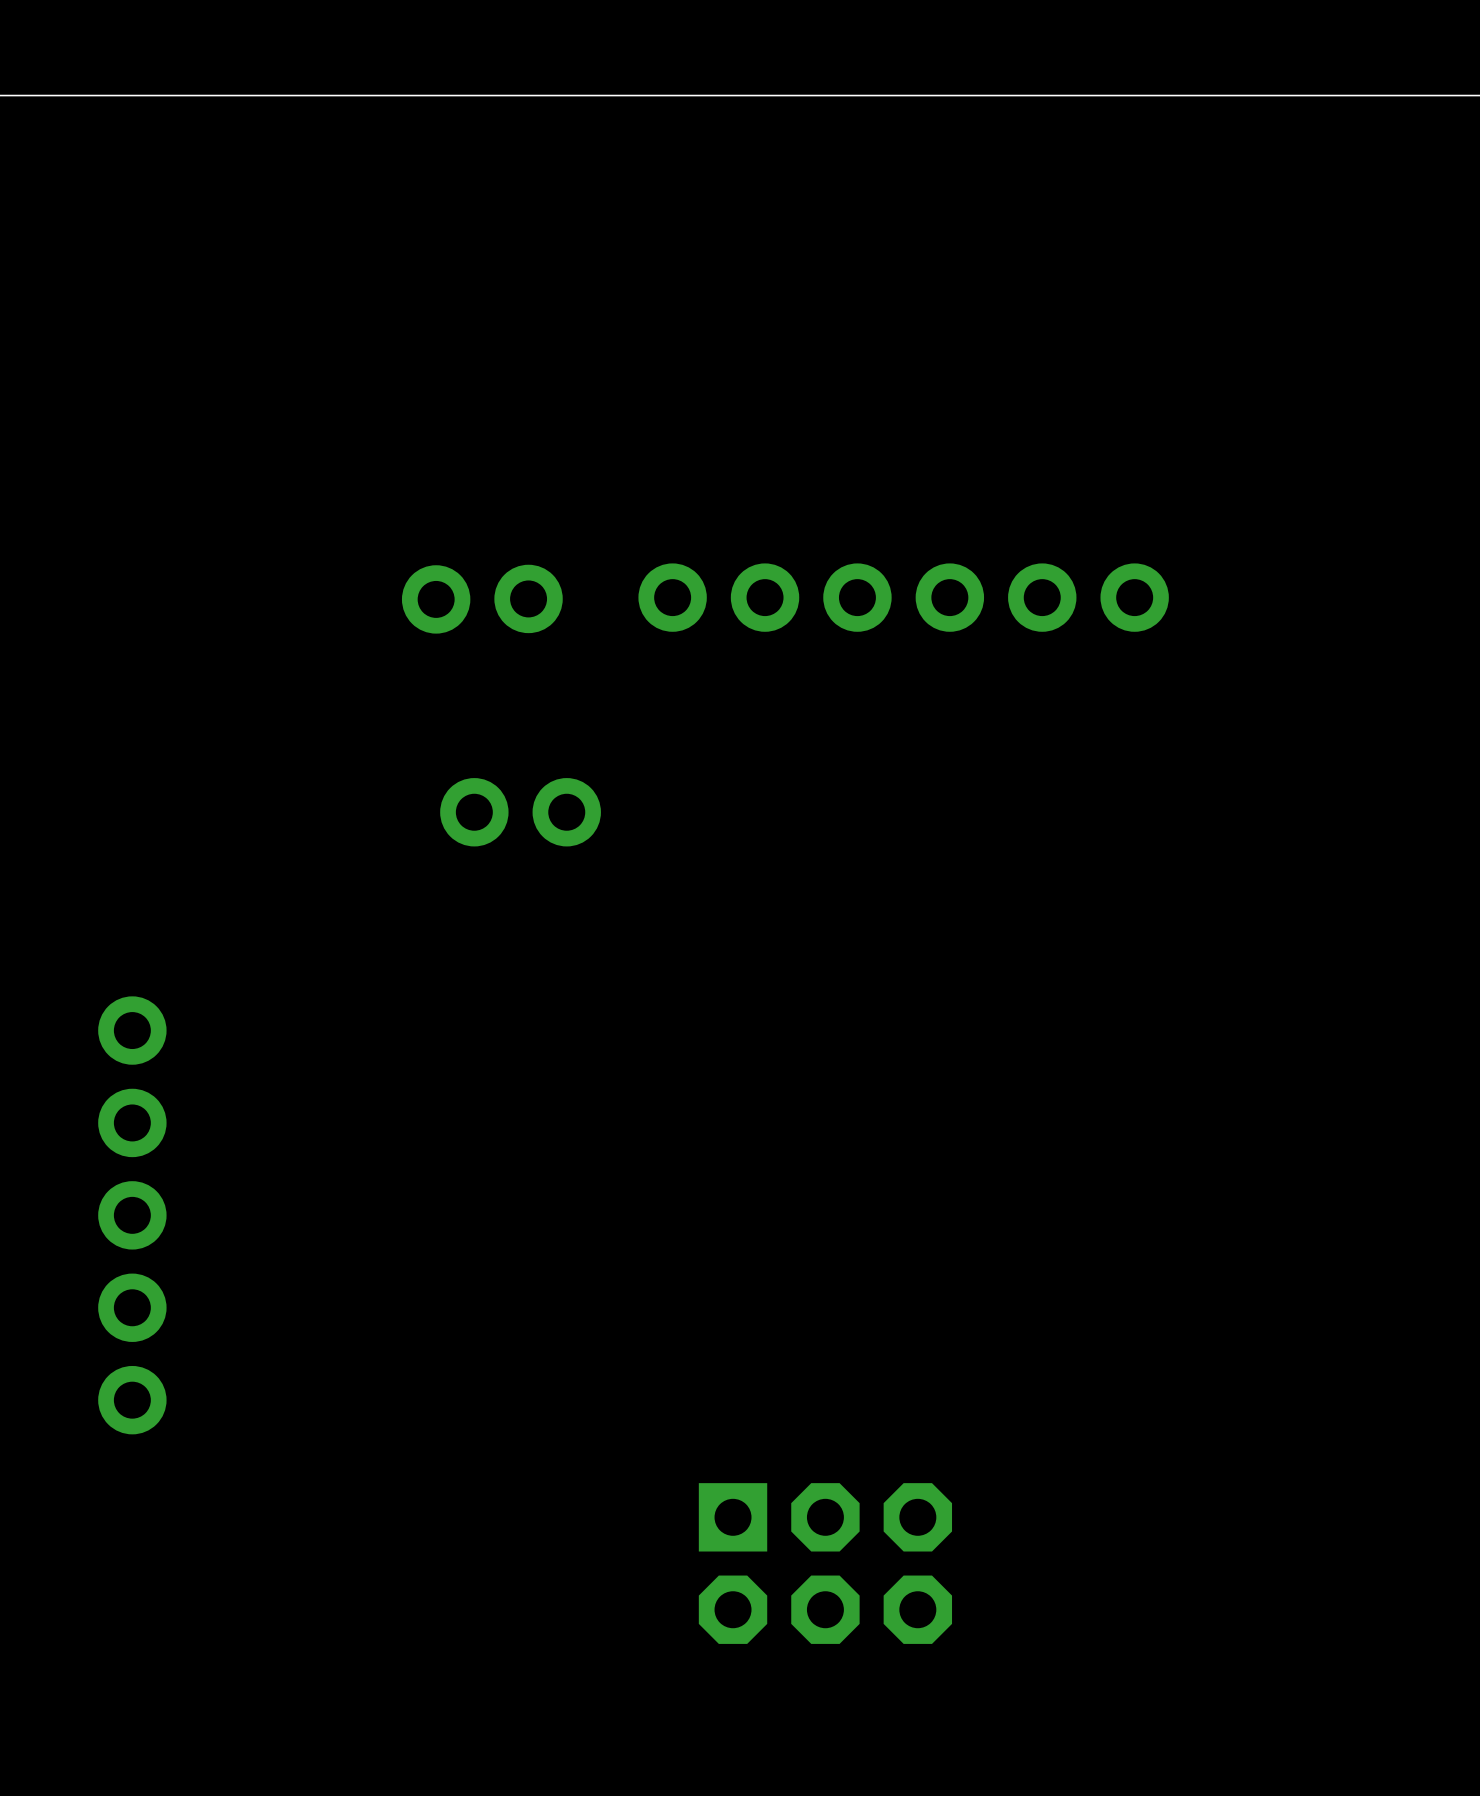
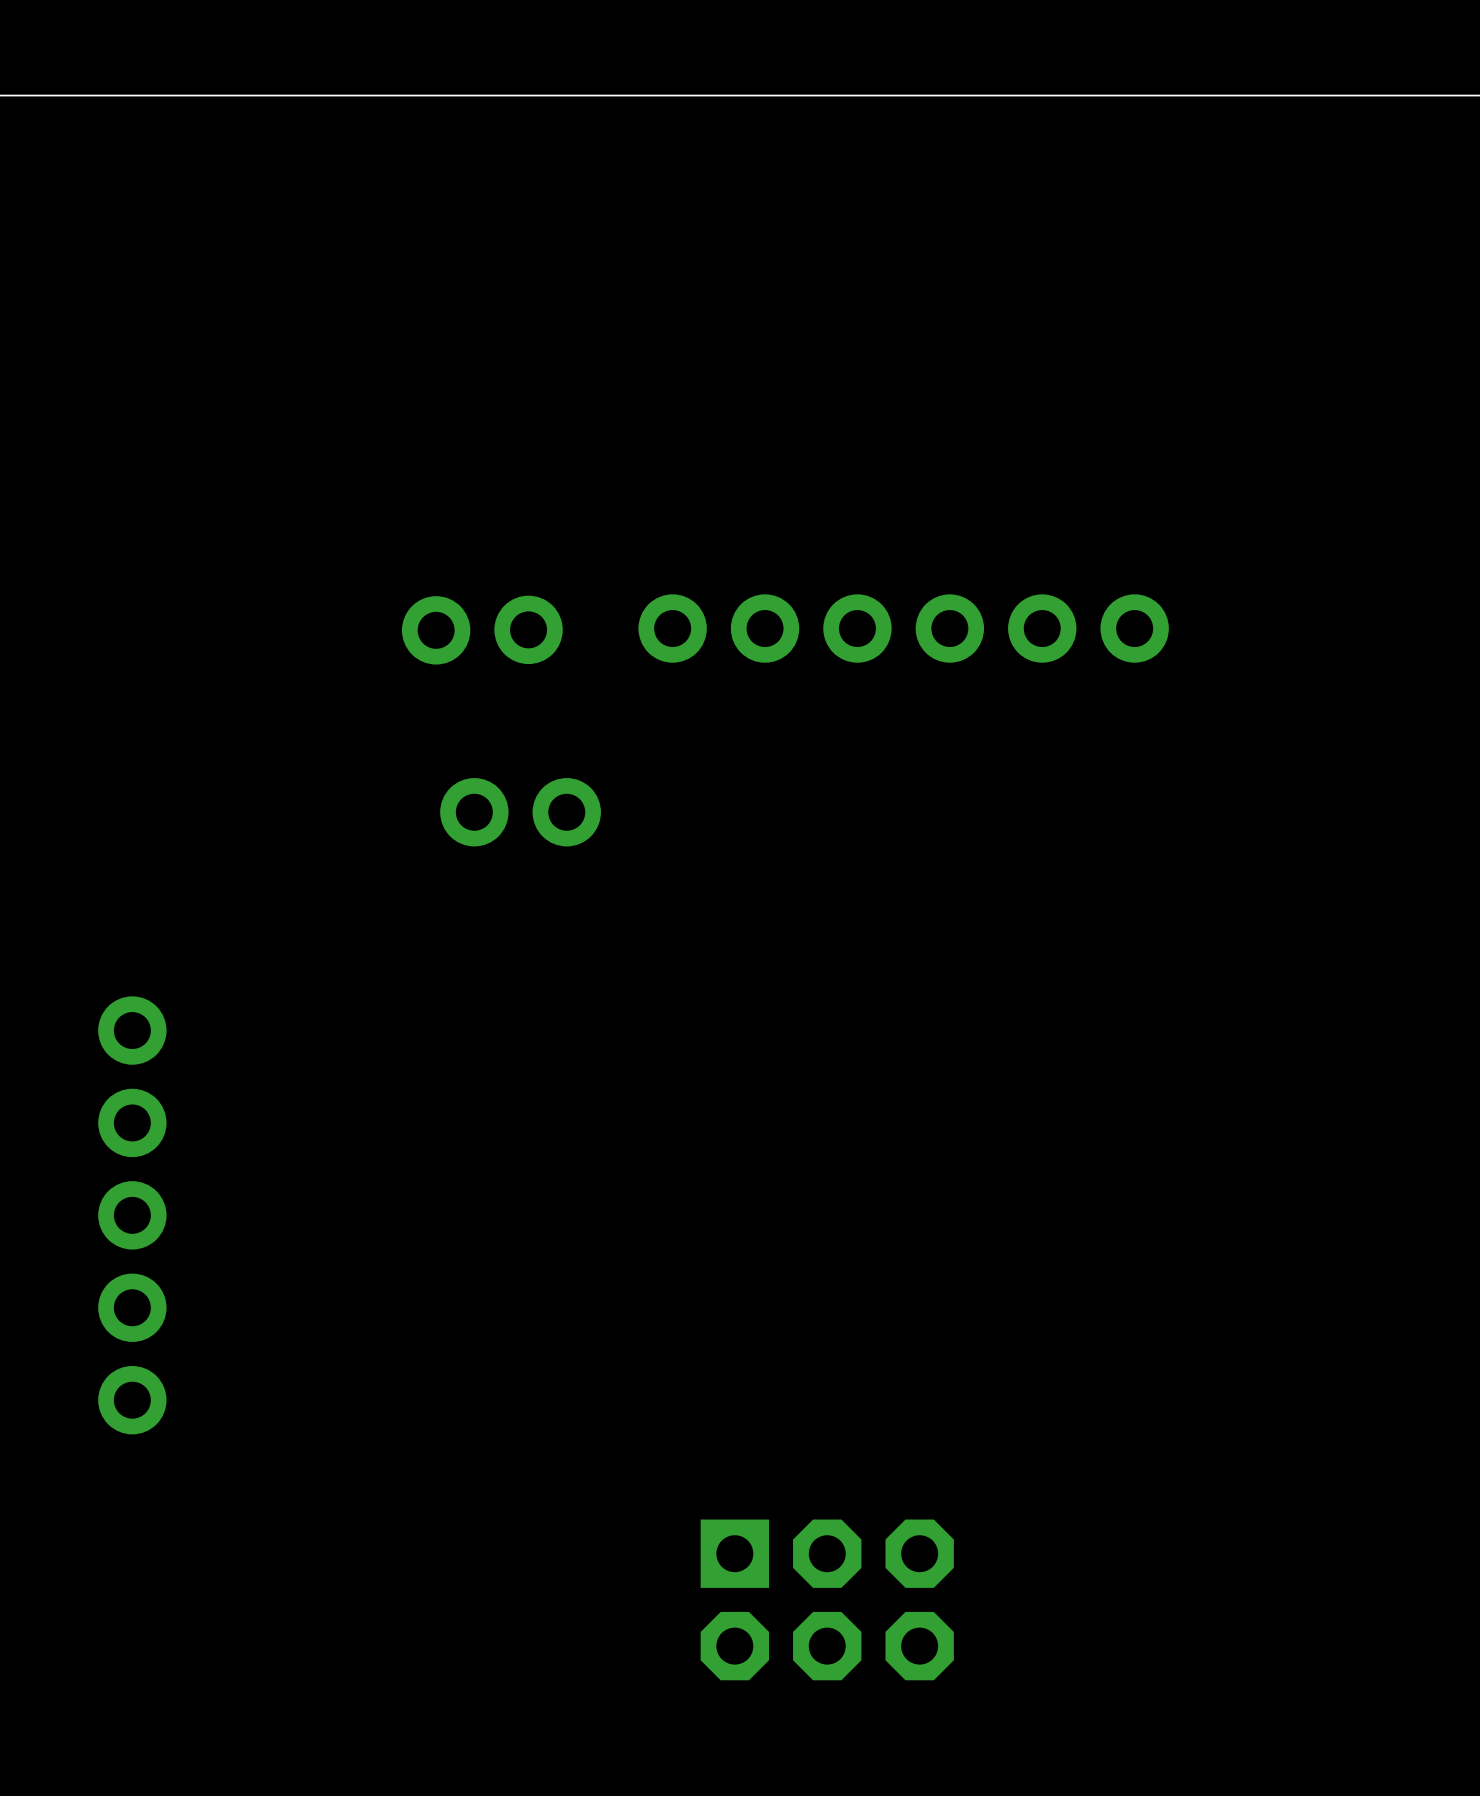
part position: (903, 597) -> (903, 628)
part position: (482, 599) -> (482, 630)
part position: (825, 1563) -> (827, 1599)

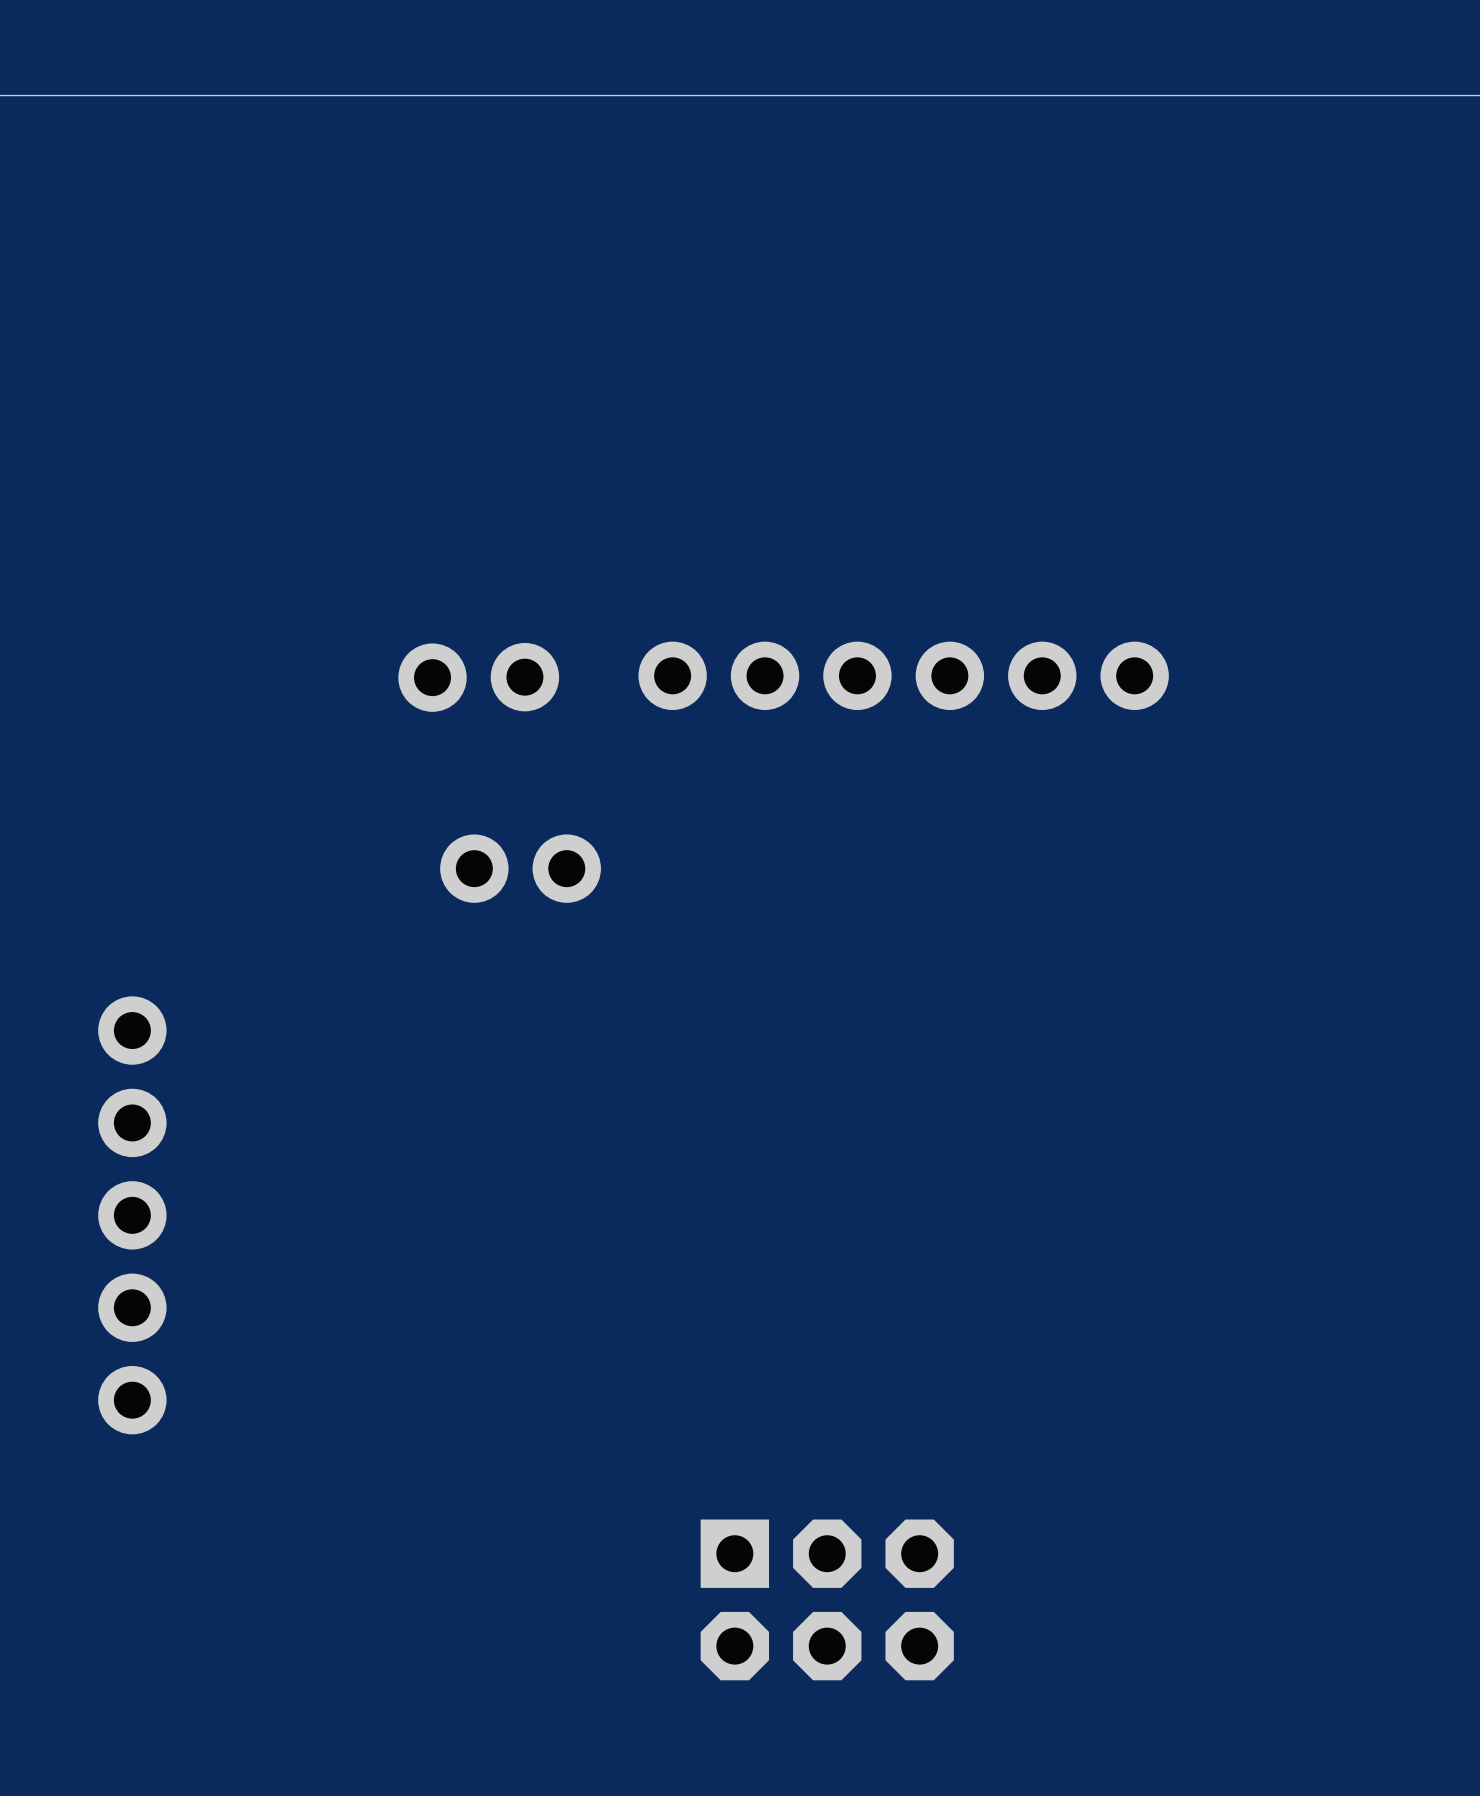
part position: (903, 628) -> (903, 675)
part position: (482, 630) -> (478, 677)
part position: (520, 812) -> (520, 868)

